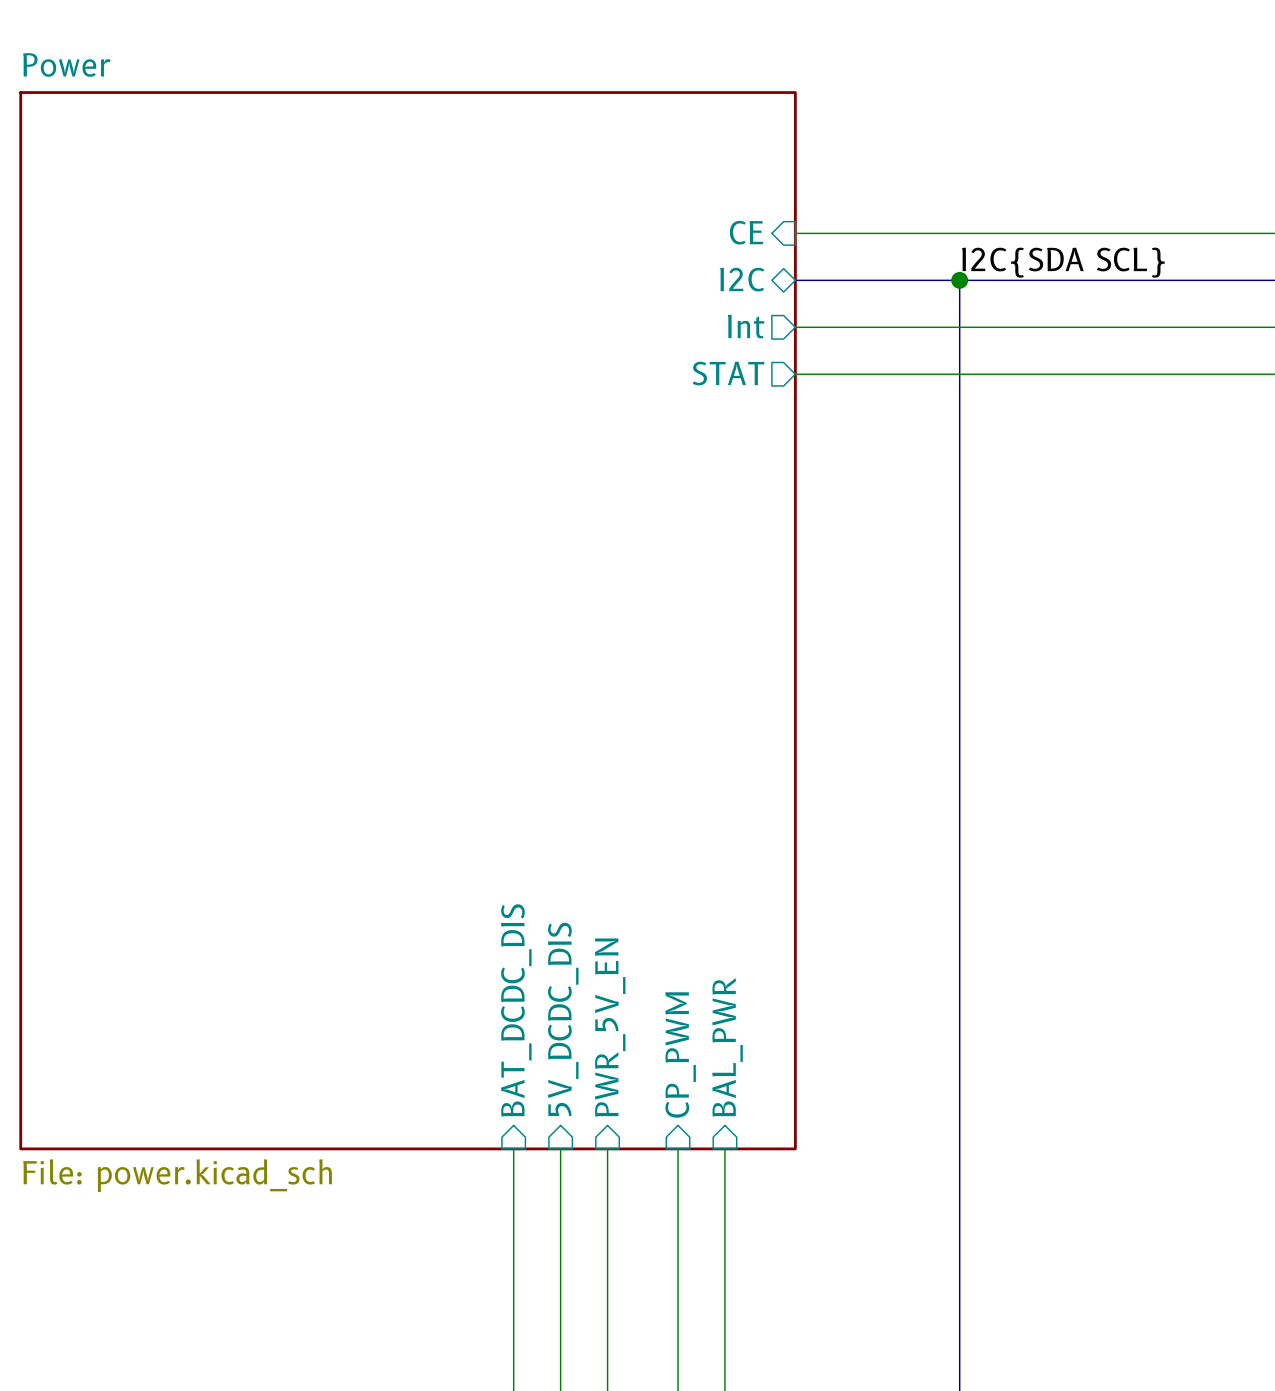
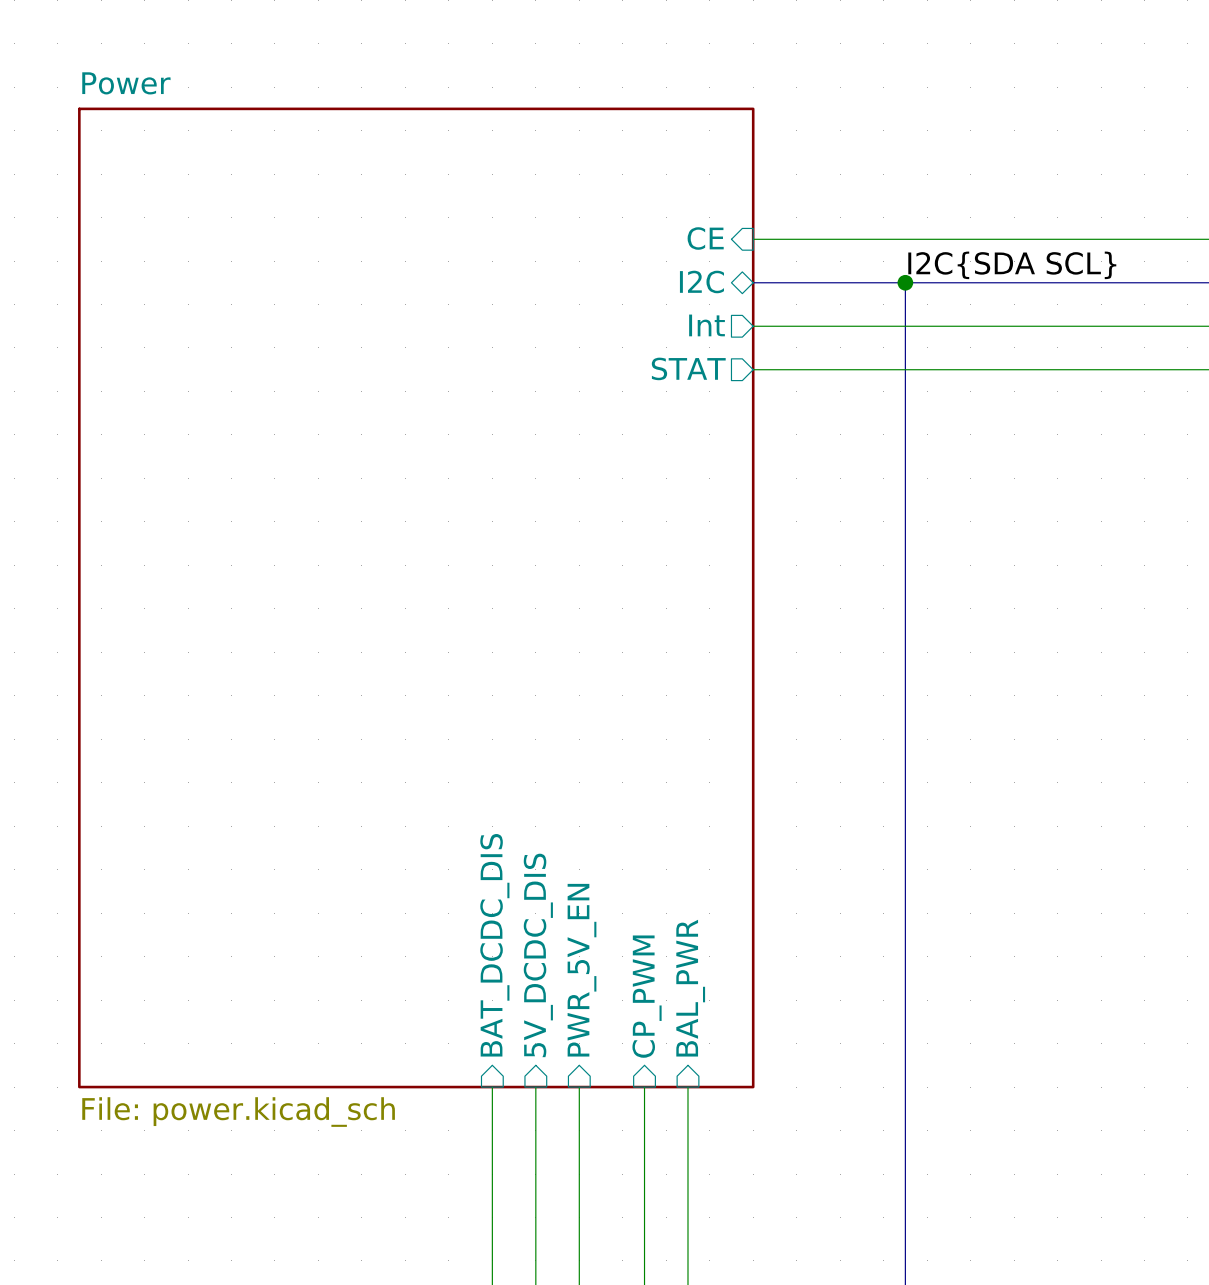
sheet Power: File: power.kicad_sch (408, 620) -> none
sheet Power: none -> File: power.kicad_sch (416, 597)

